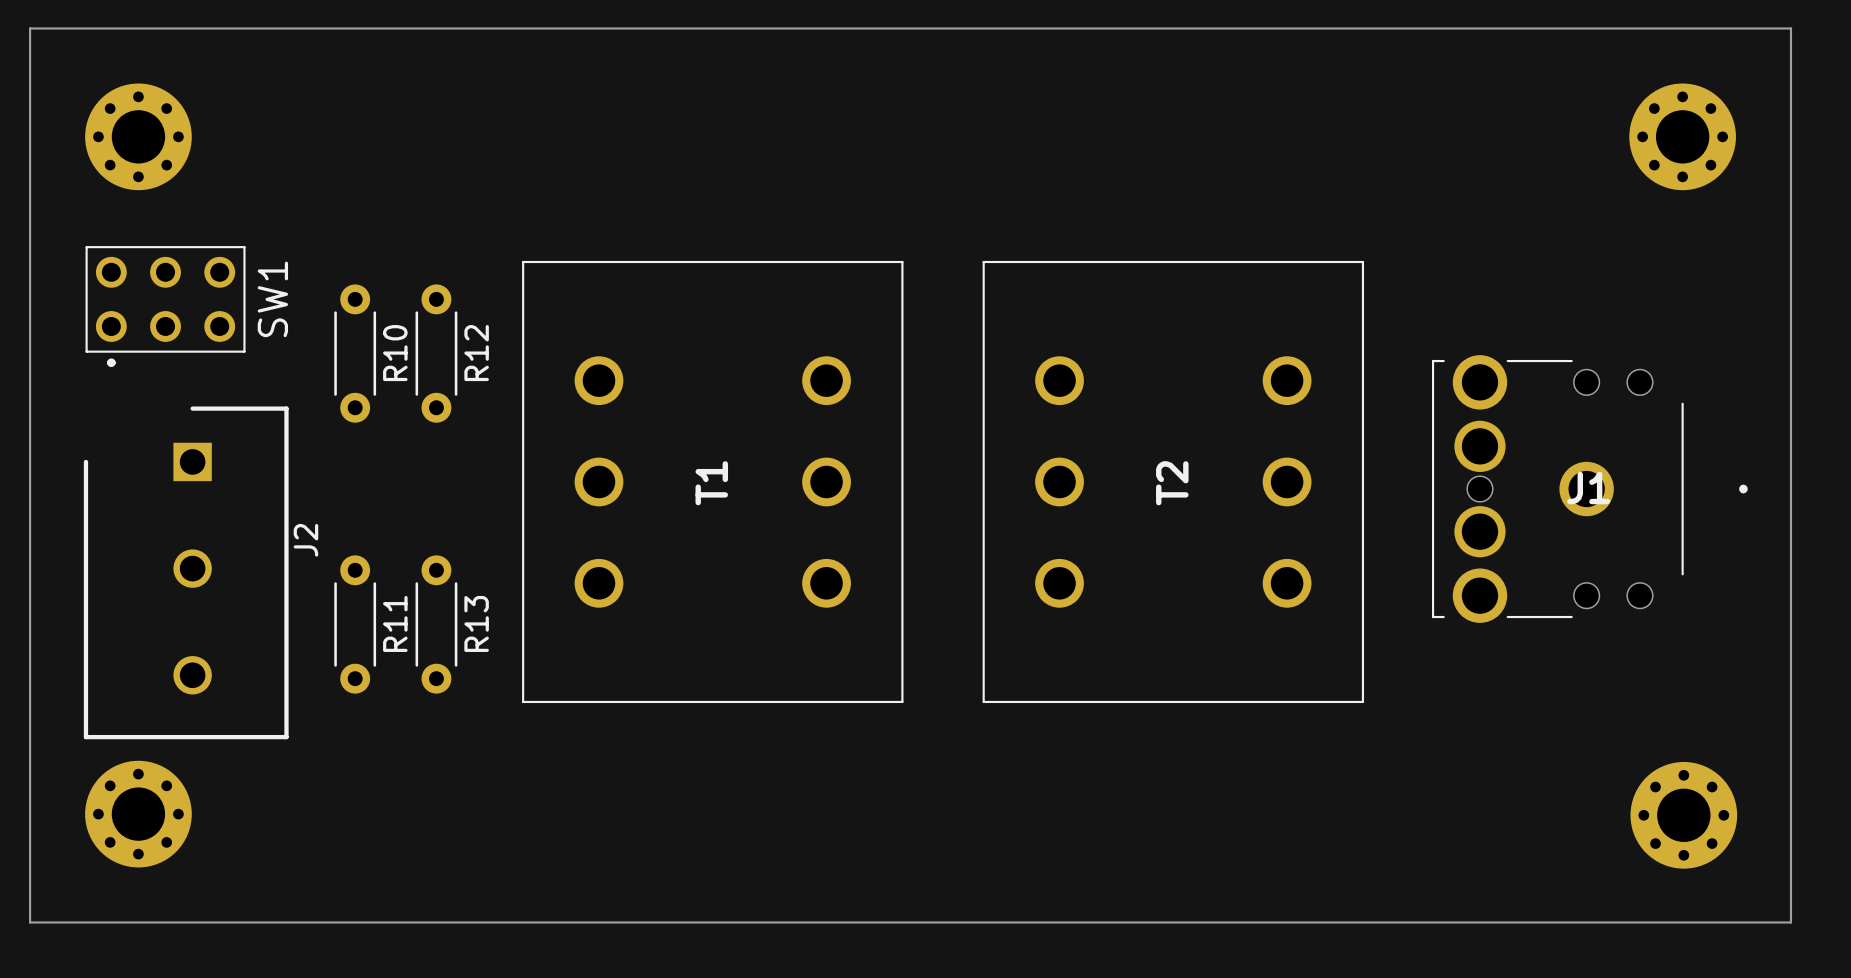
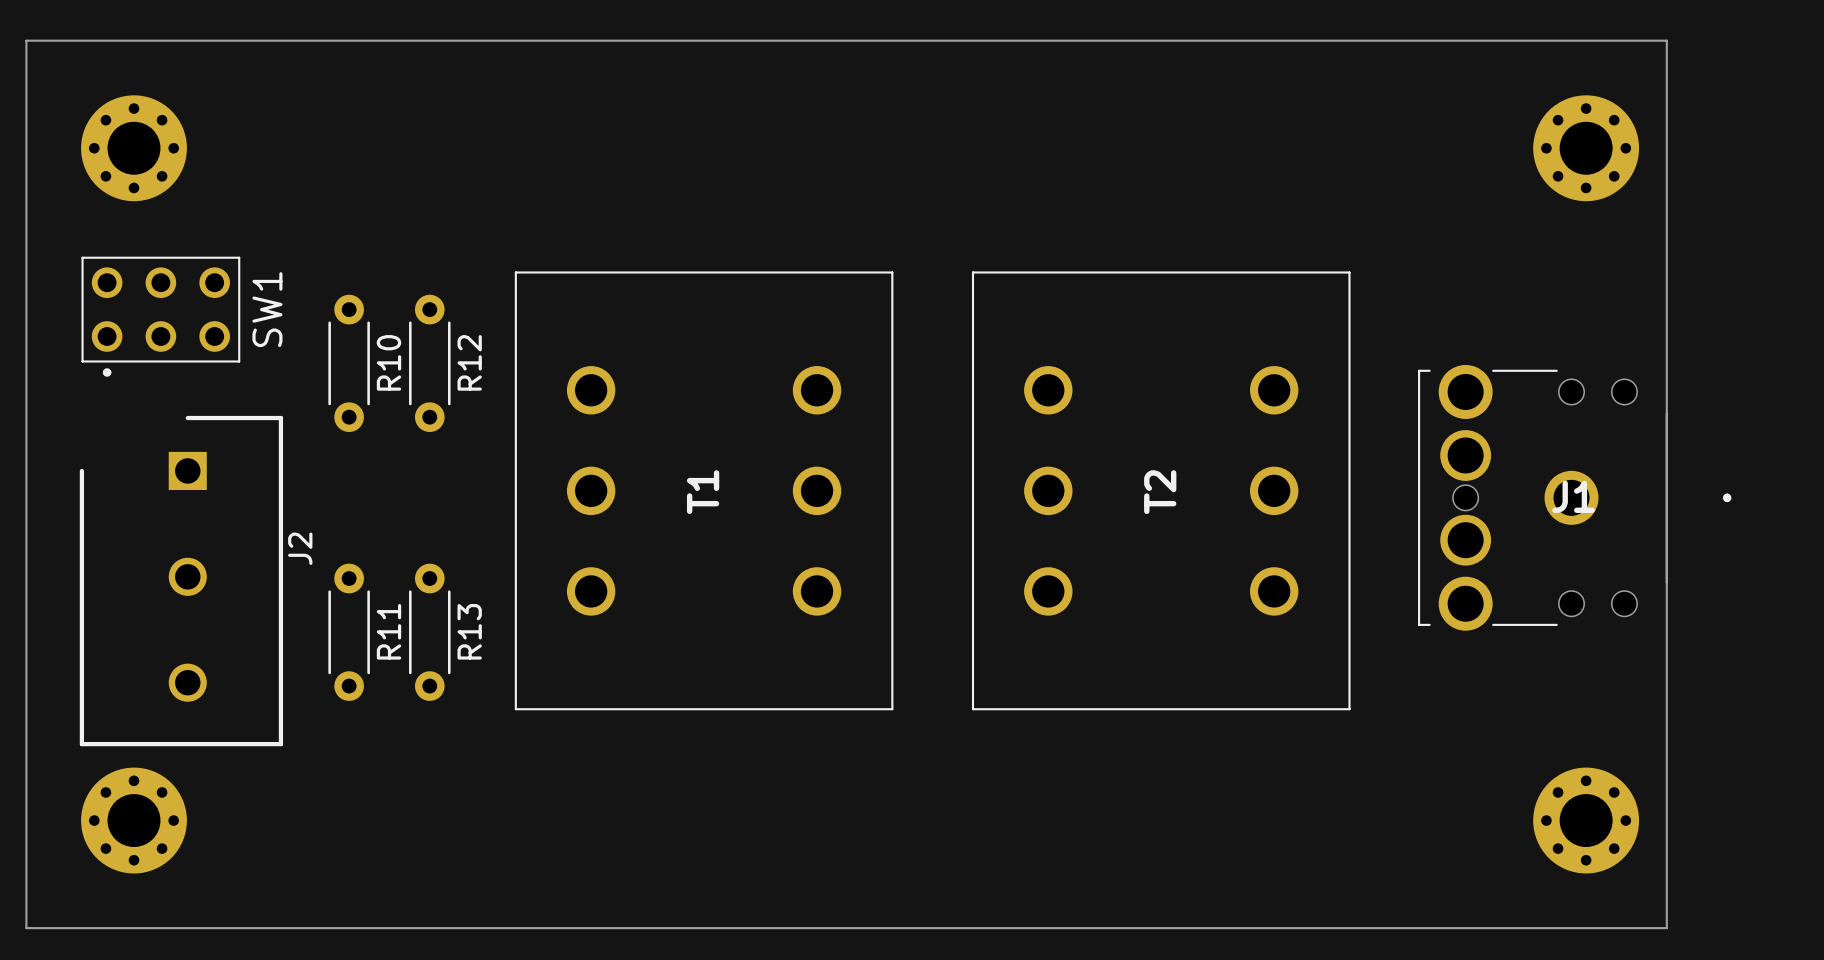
board edge: (1682, 28) (1790, 28) (1790, 922) (1682, 922) -> (1666, 40) (1666, 928)
part position: (1682, 136) -> (1586, 148)
part position: (1683, 815) -> (1586, 820)

